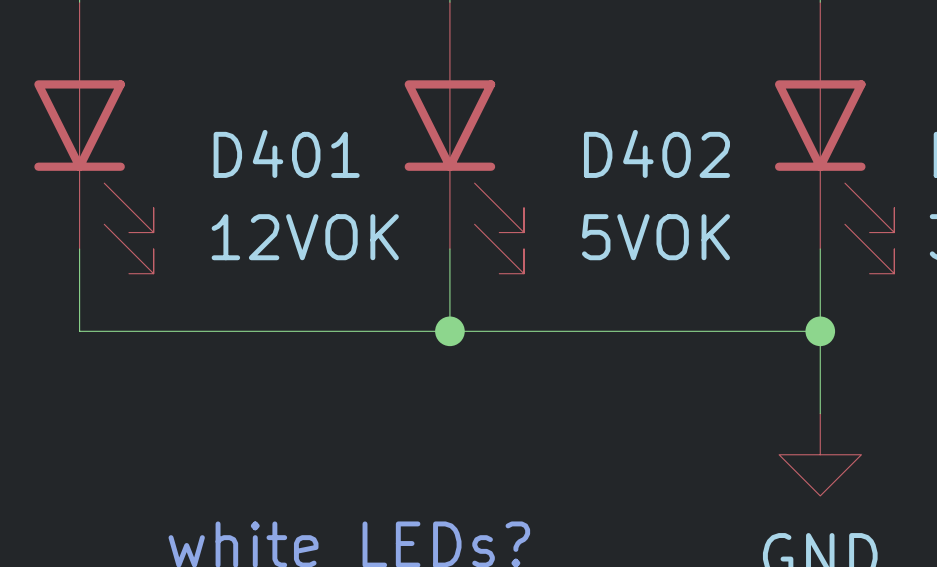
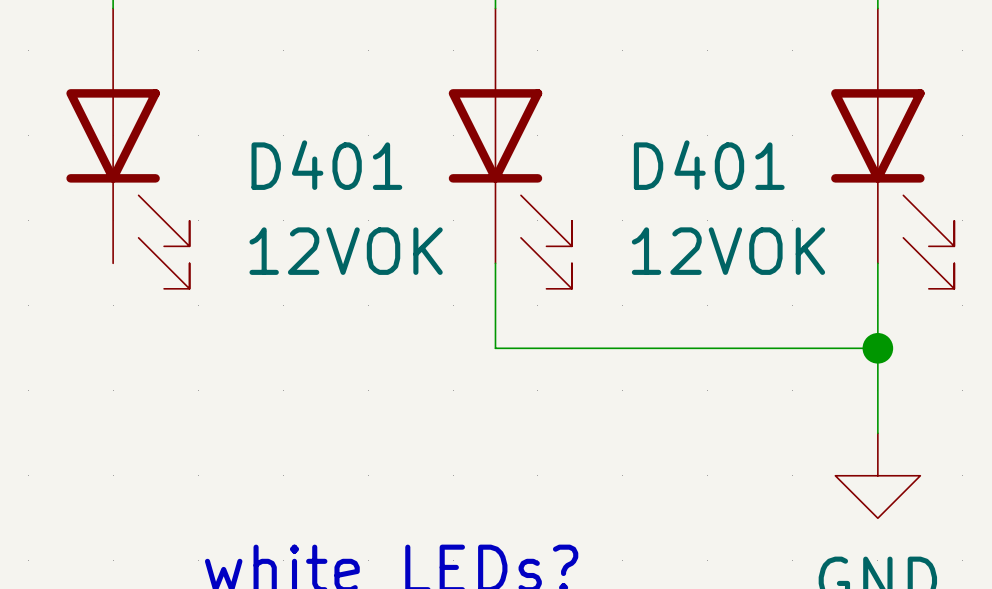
D402 name: D402 (656, 153) -> D401 (709, 165)
D402 value: 5VOK (655, 237) -> 12VOK (728, 251)
wire: (79, 249) (79, 331) (449, 331) -> none
junction: (449, 331) -> none

